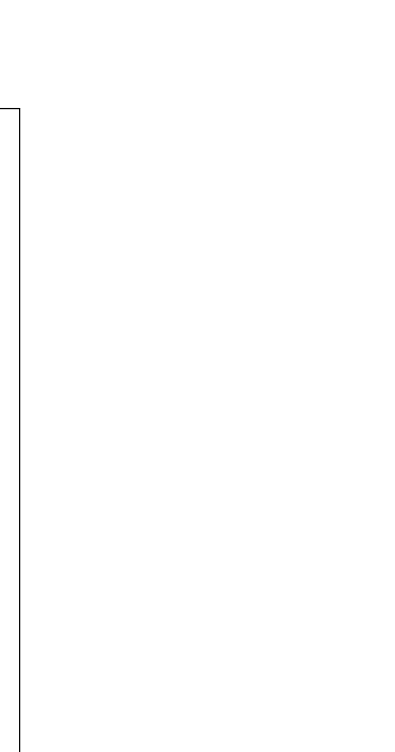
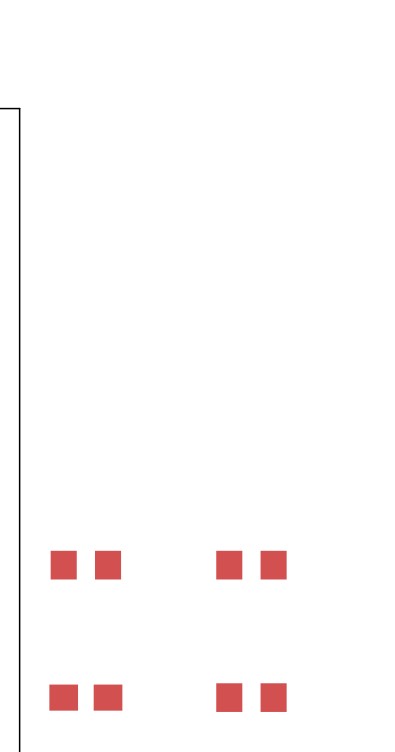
part: none -> (85, 565)
part: none -> (251, 565)
part: none -> (85, 697)
part: none -> (251, 697)

